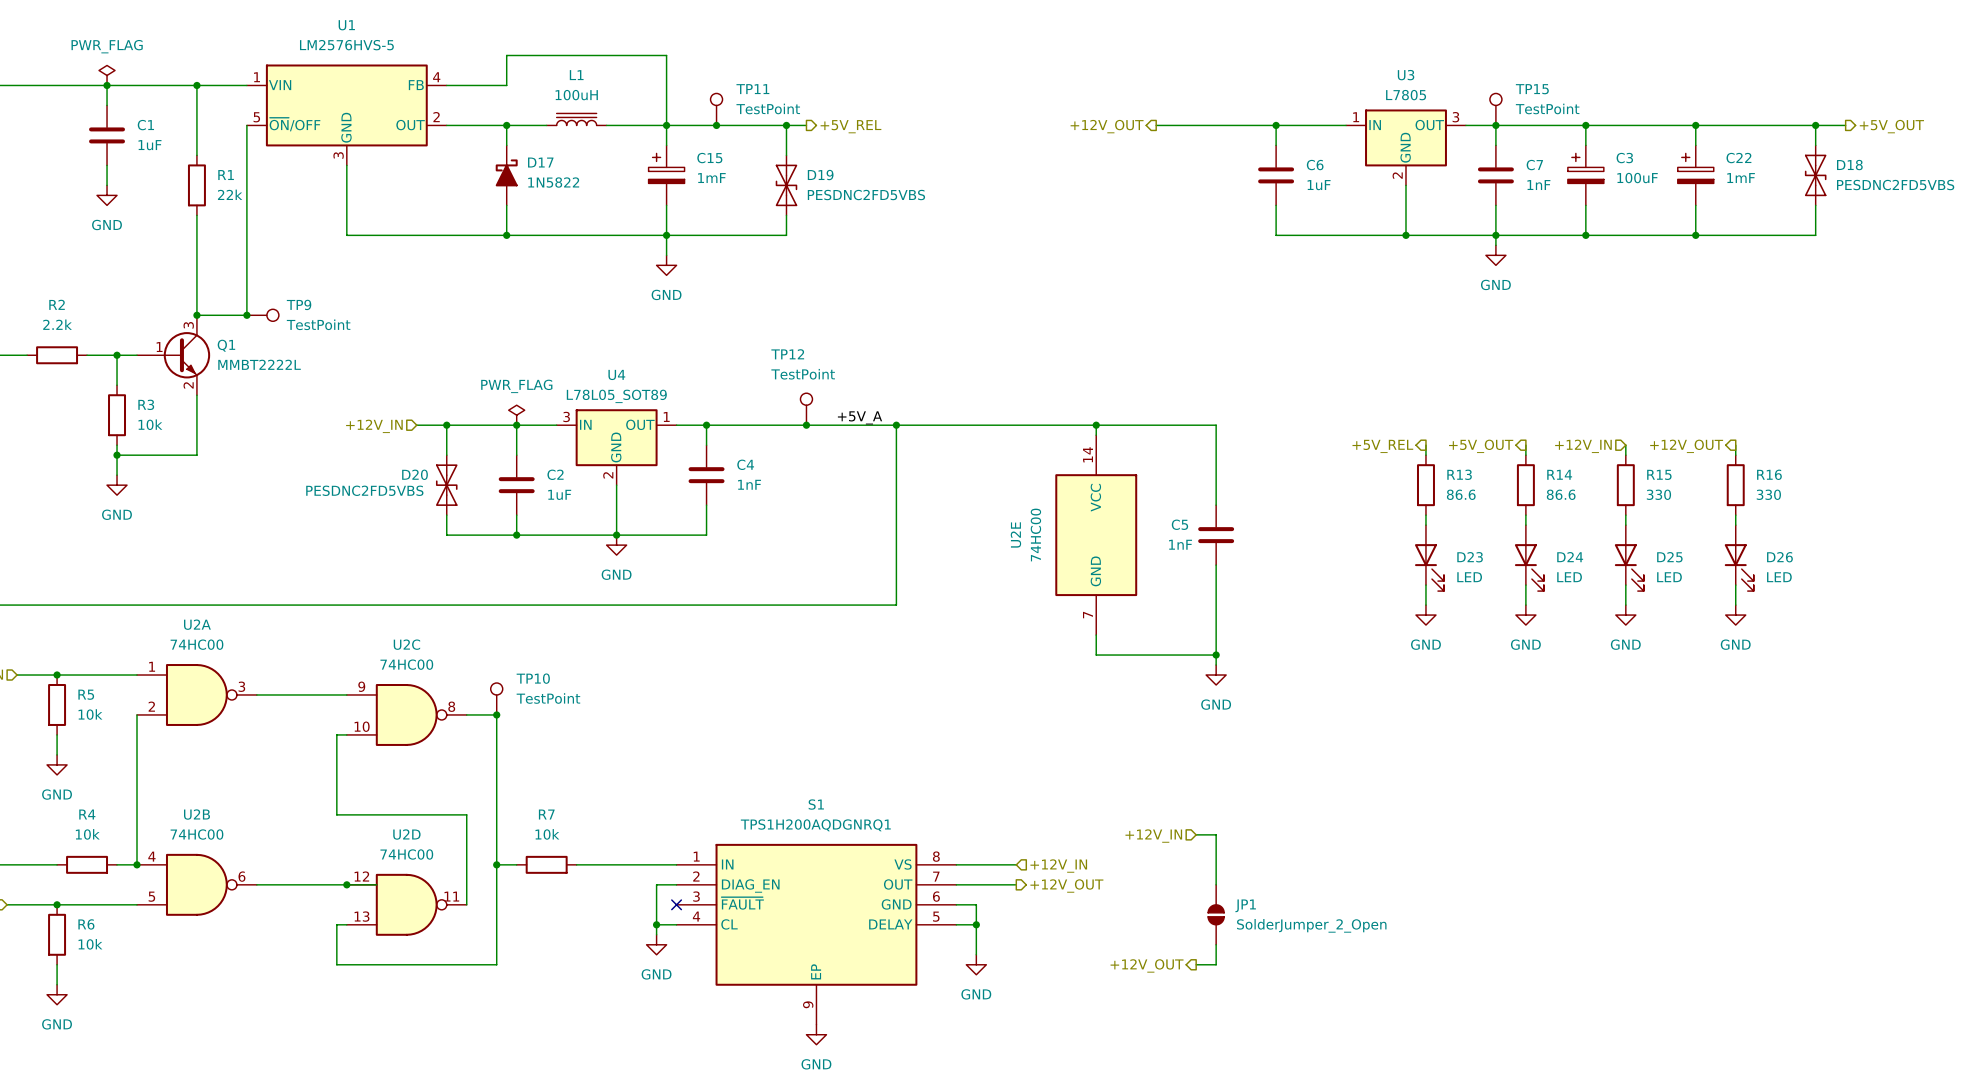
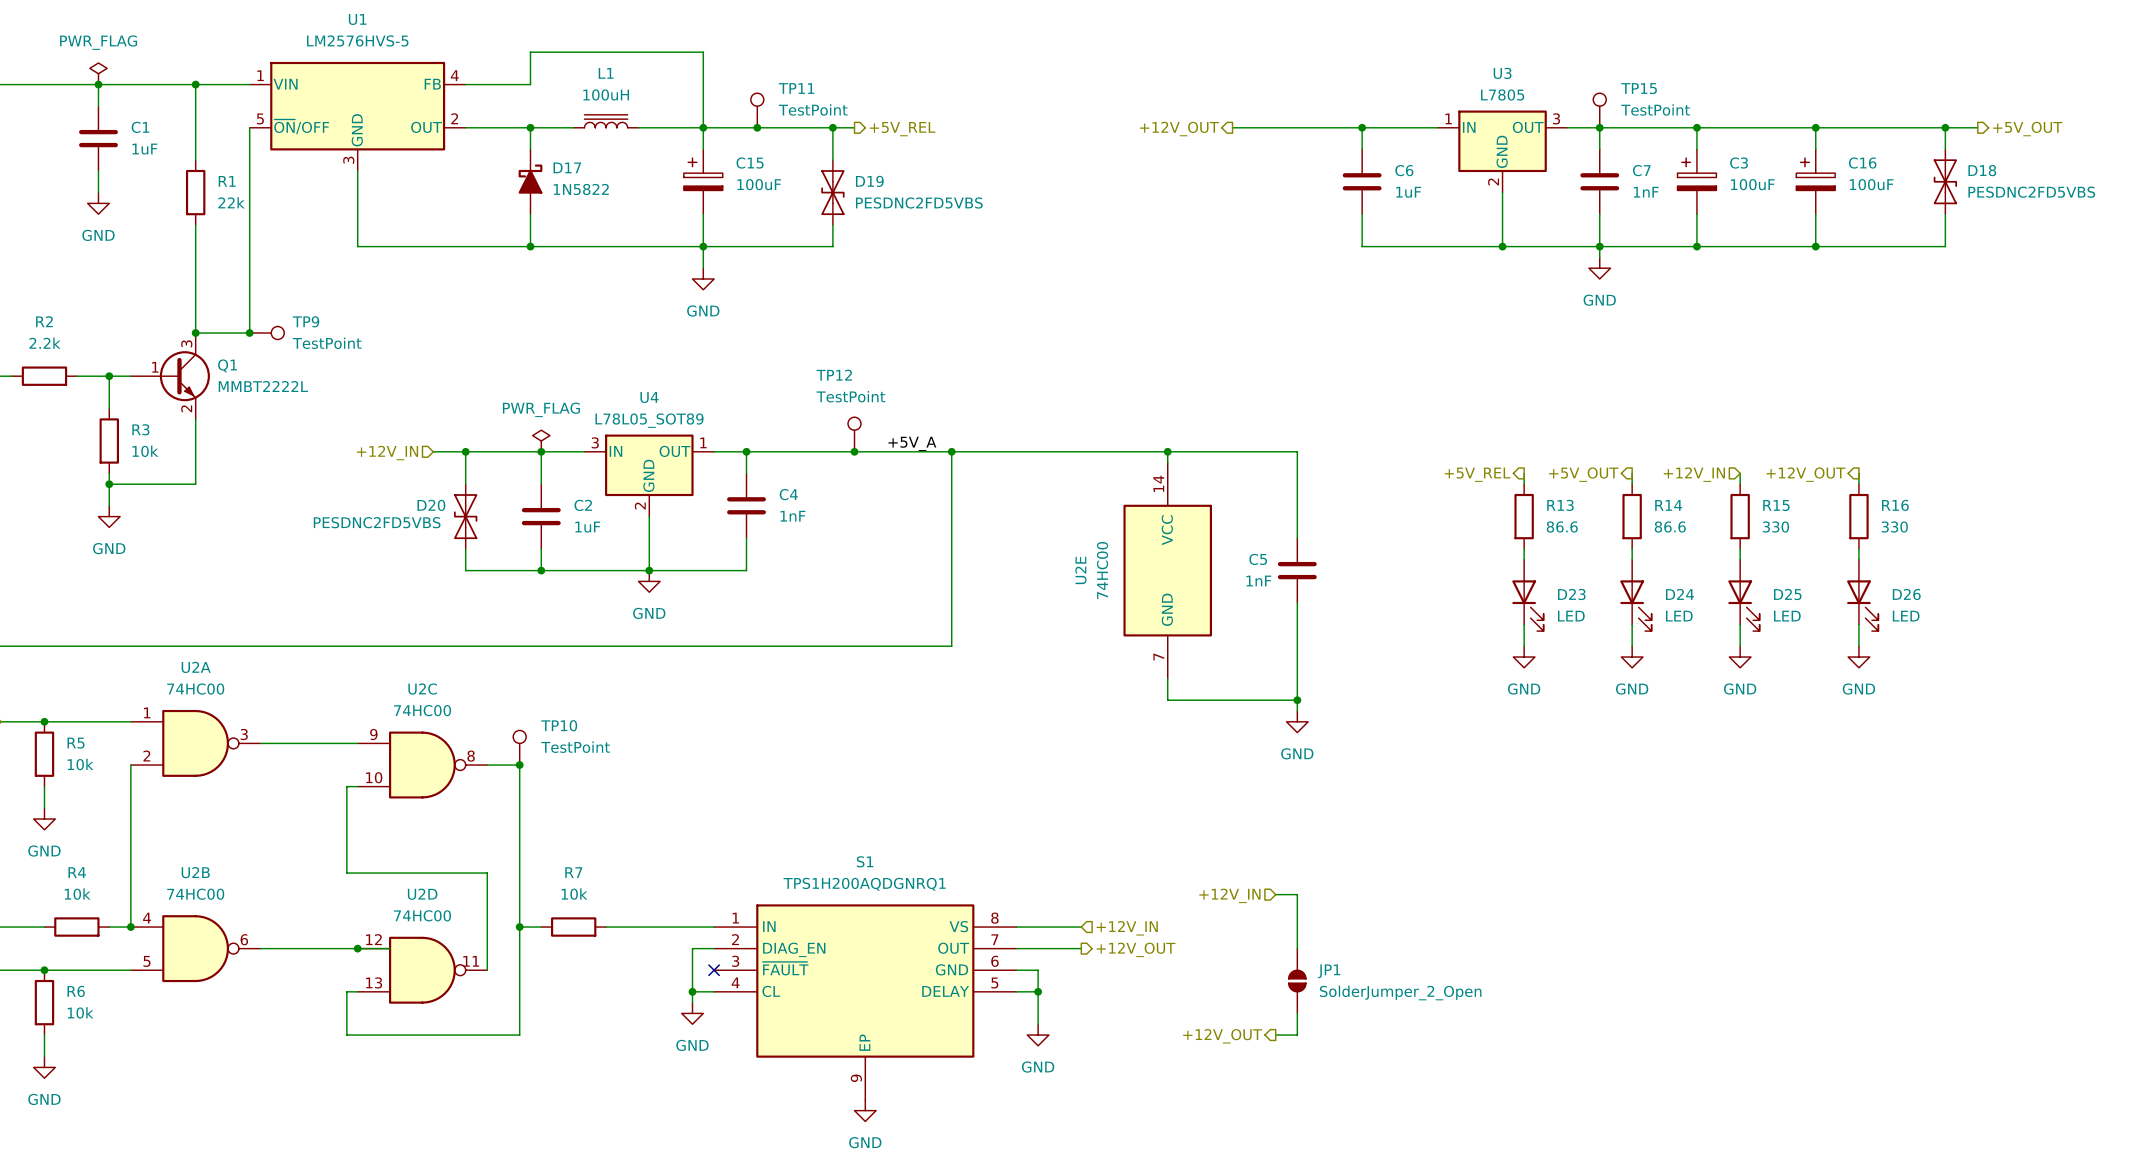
C22 name: C22 (1738, 158) -> C16 (1862, 163)
C15 value: 1mF (711, 178) -> 100uF (759, 184)
C22 value: 1mF (1741, 178) -> 100uF (1871, 184)

